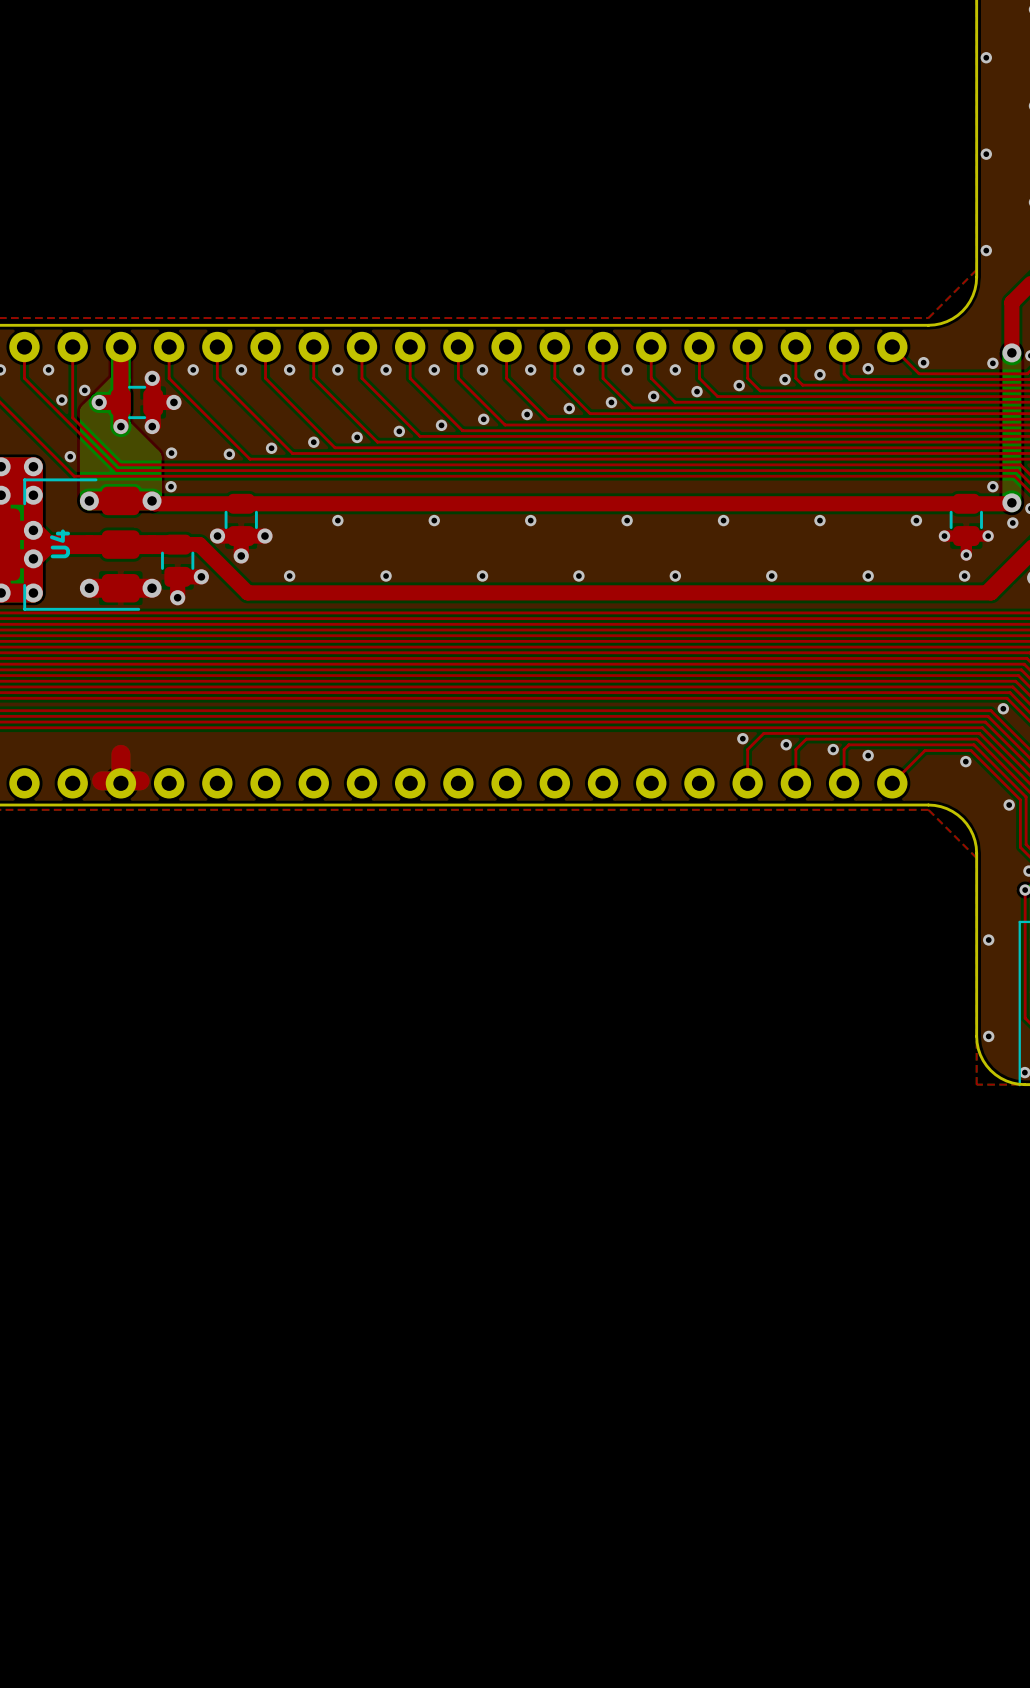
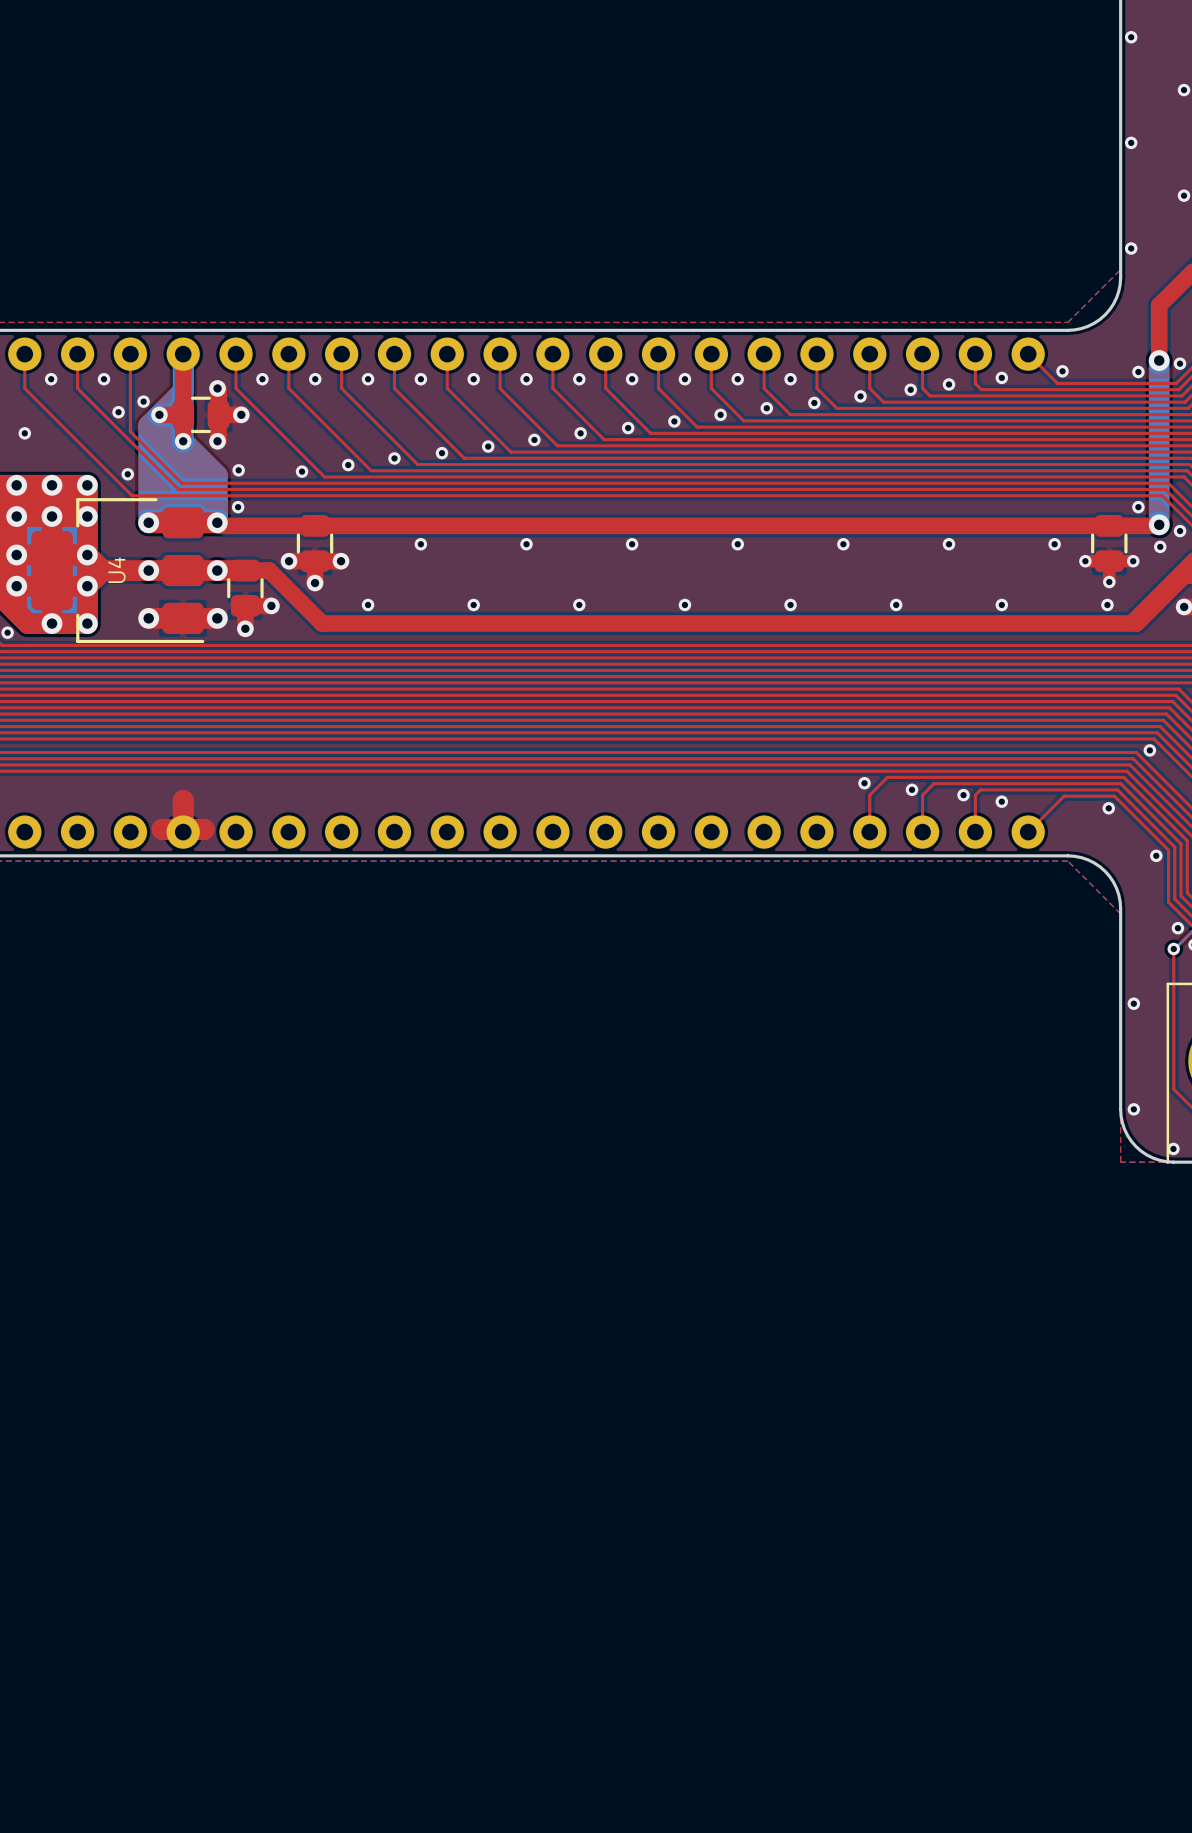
via: none -> (148, 570)
via: none -> (217, 570)

